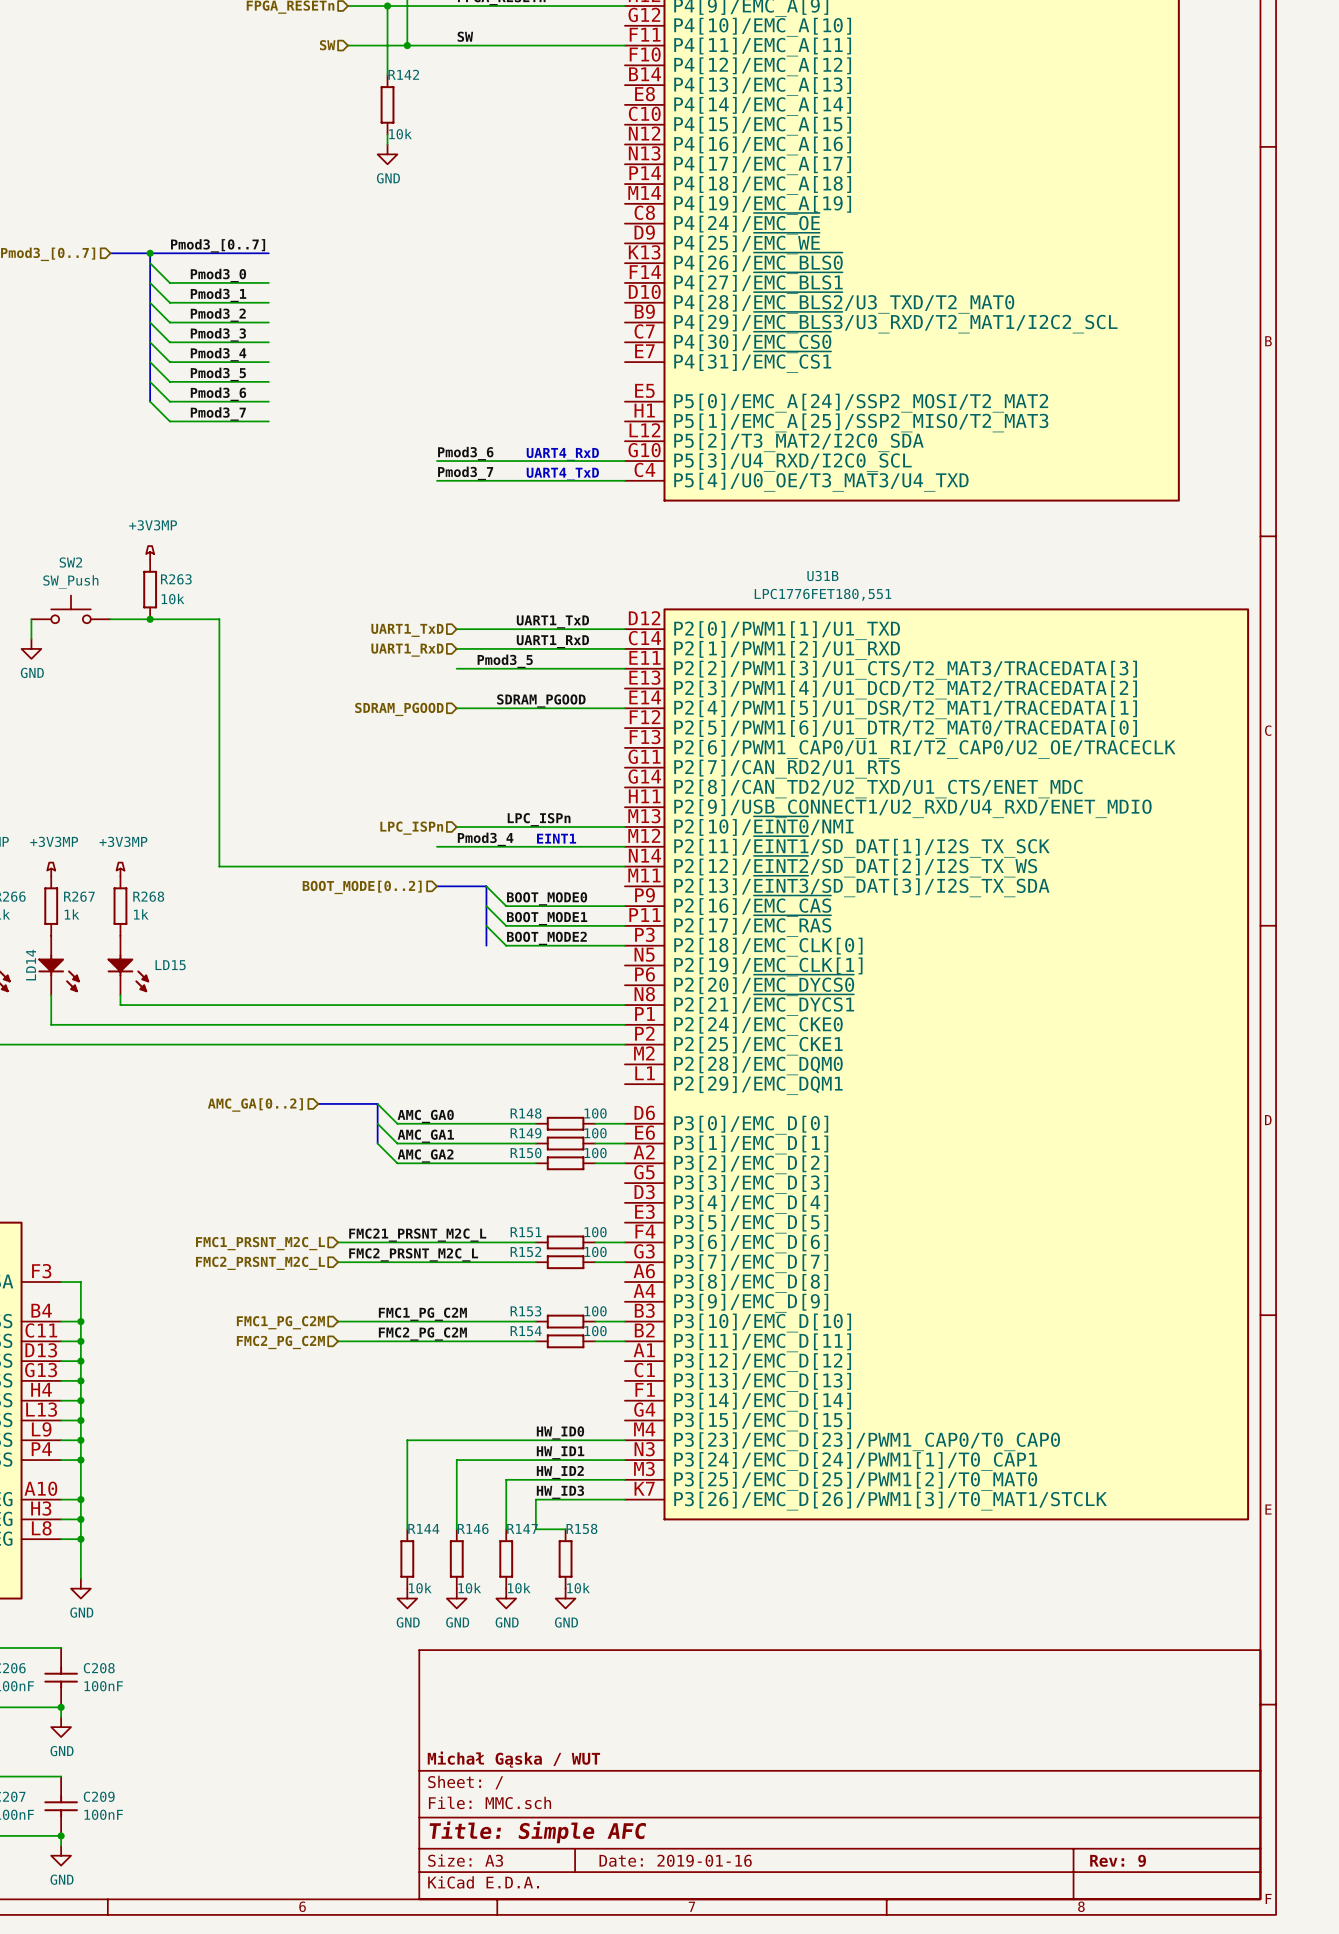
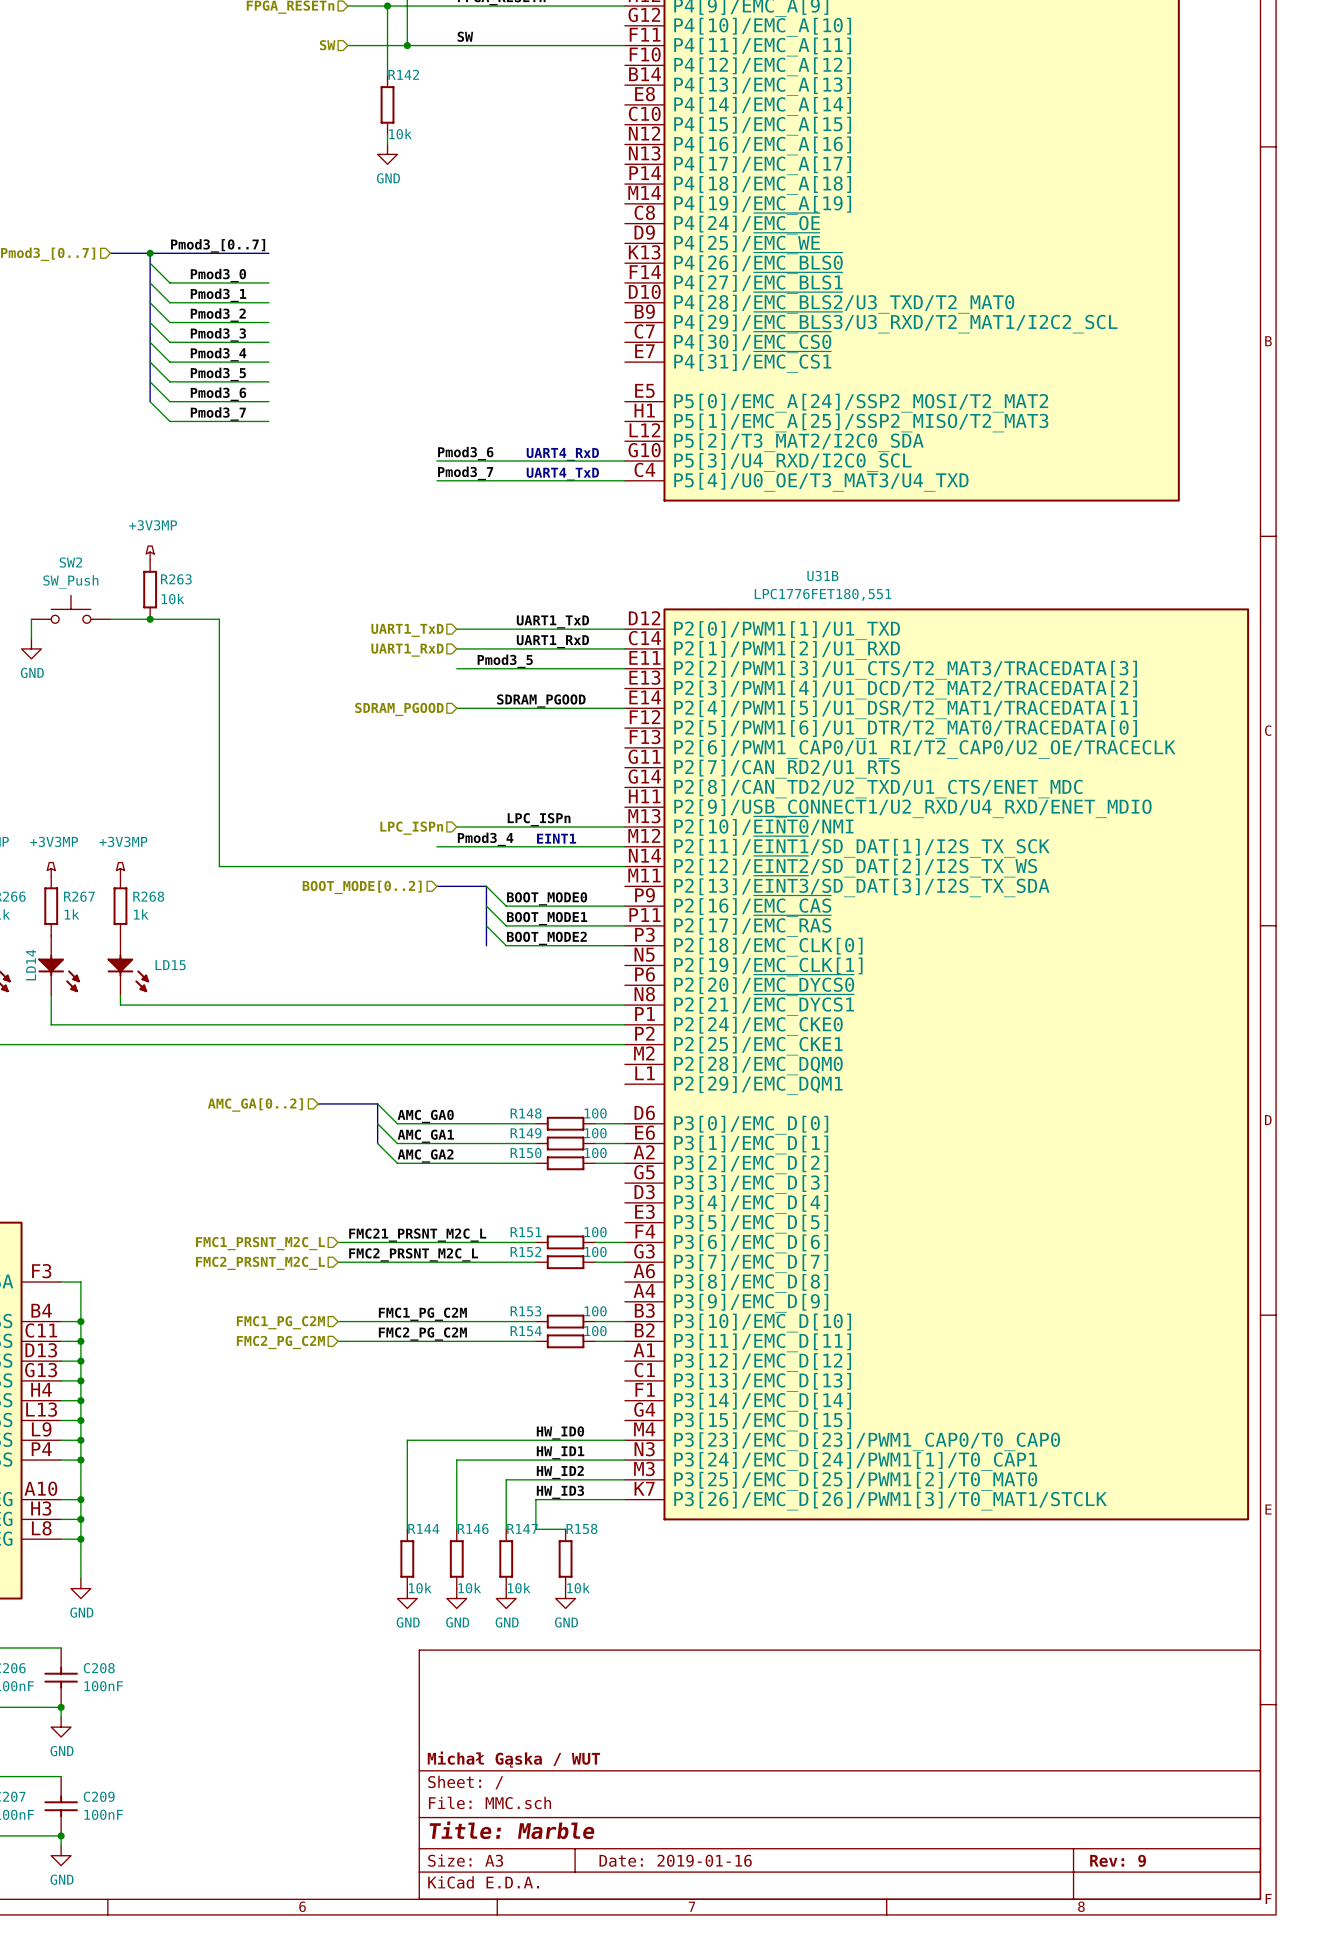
title block: Title: Simple AFC (537, 1832) -> Title: Marble (512, 1830)

